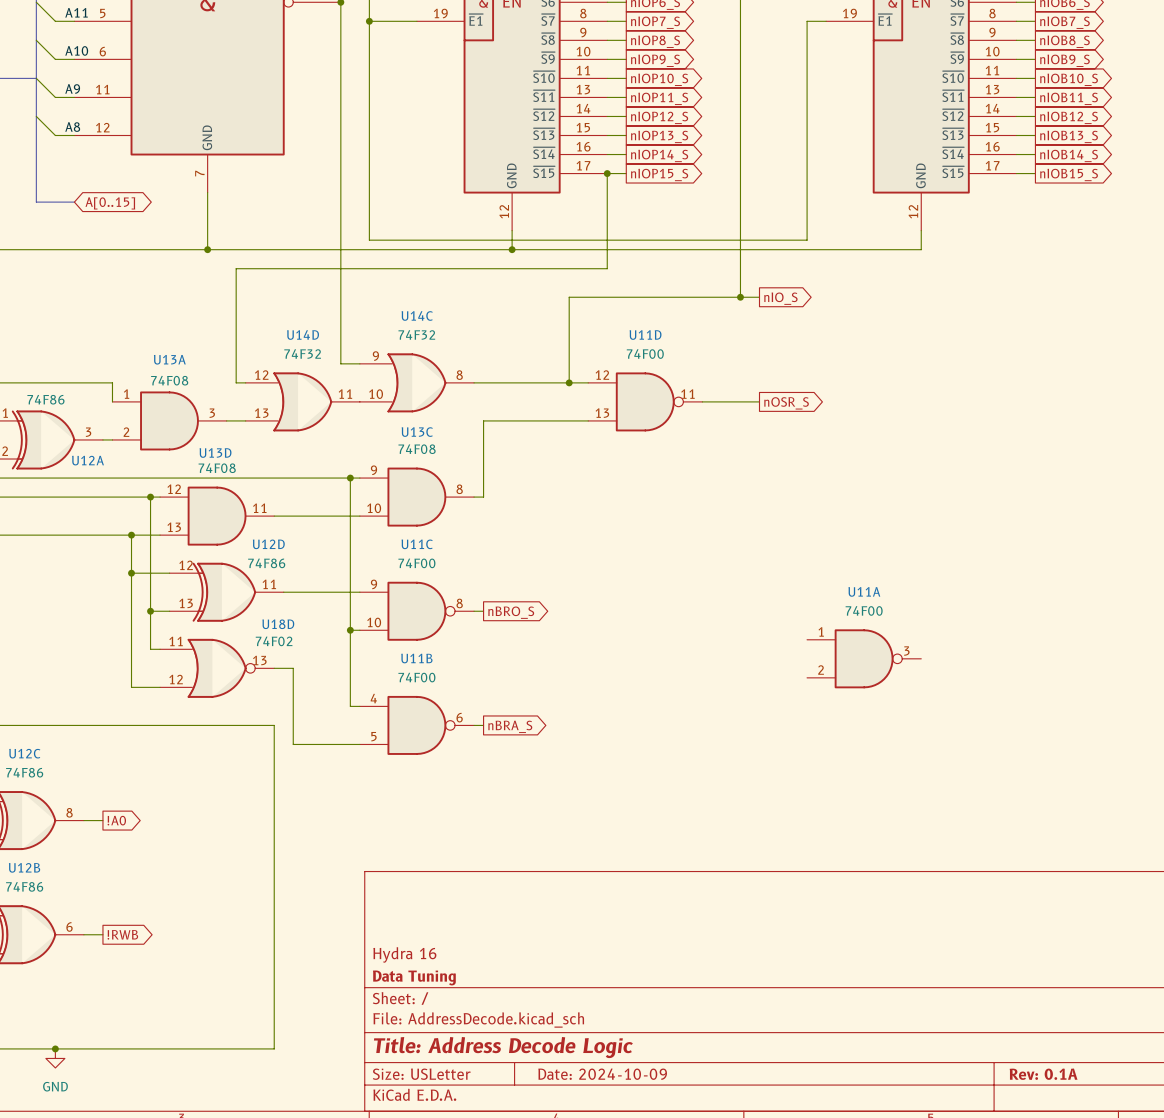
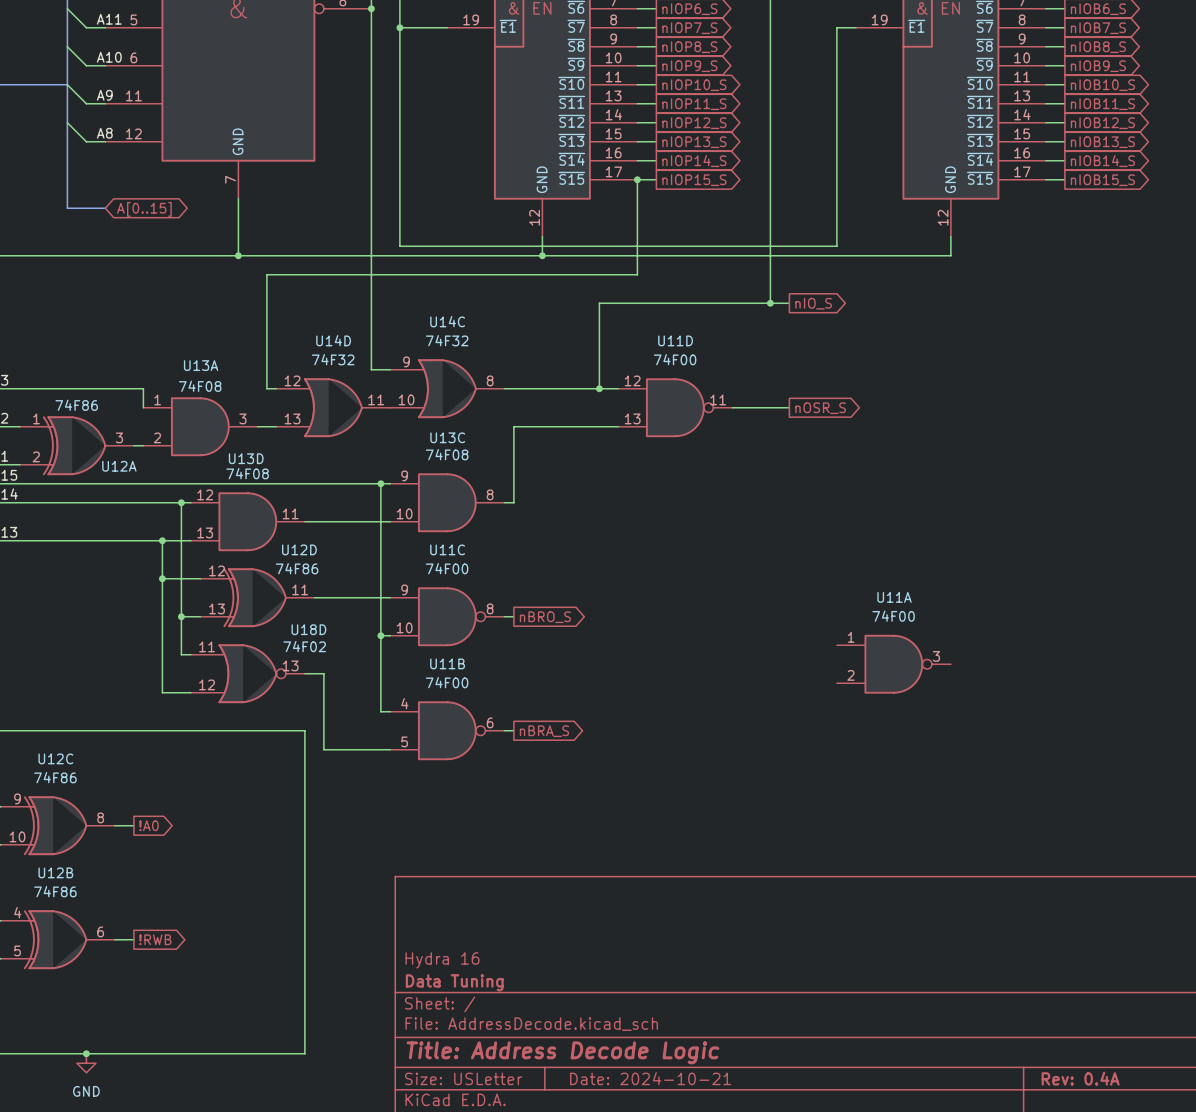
title block: Date: 2024-10-09 (602, 1074) -> Date: 2024-10-21 (650, 1078)
title block: Rev: 0.1A (1043, 1074) -> Rev: 0.4A (1080, 1078)

